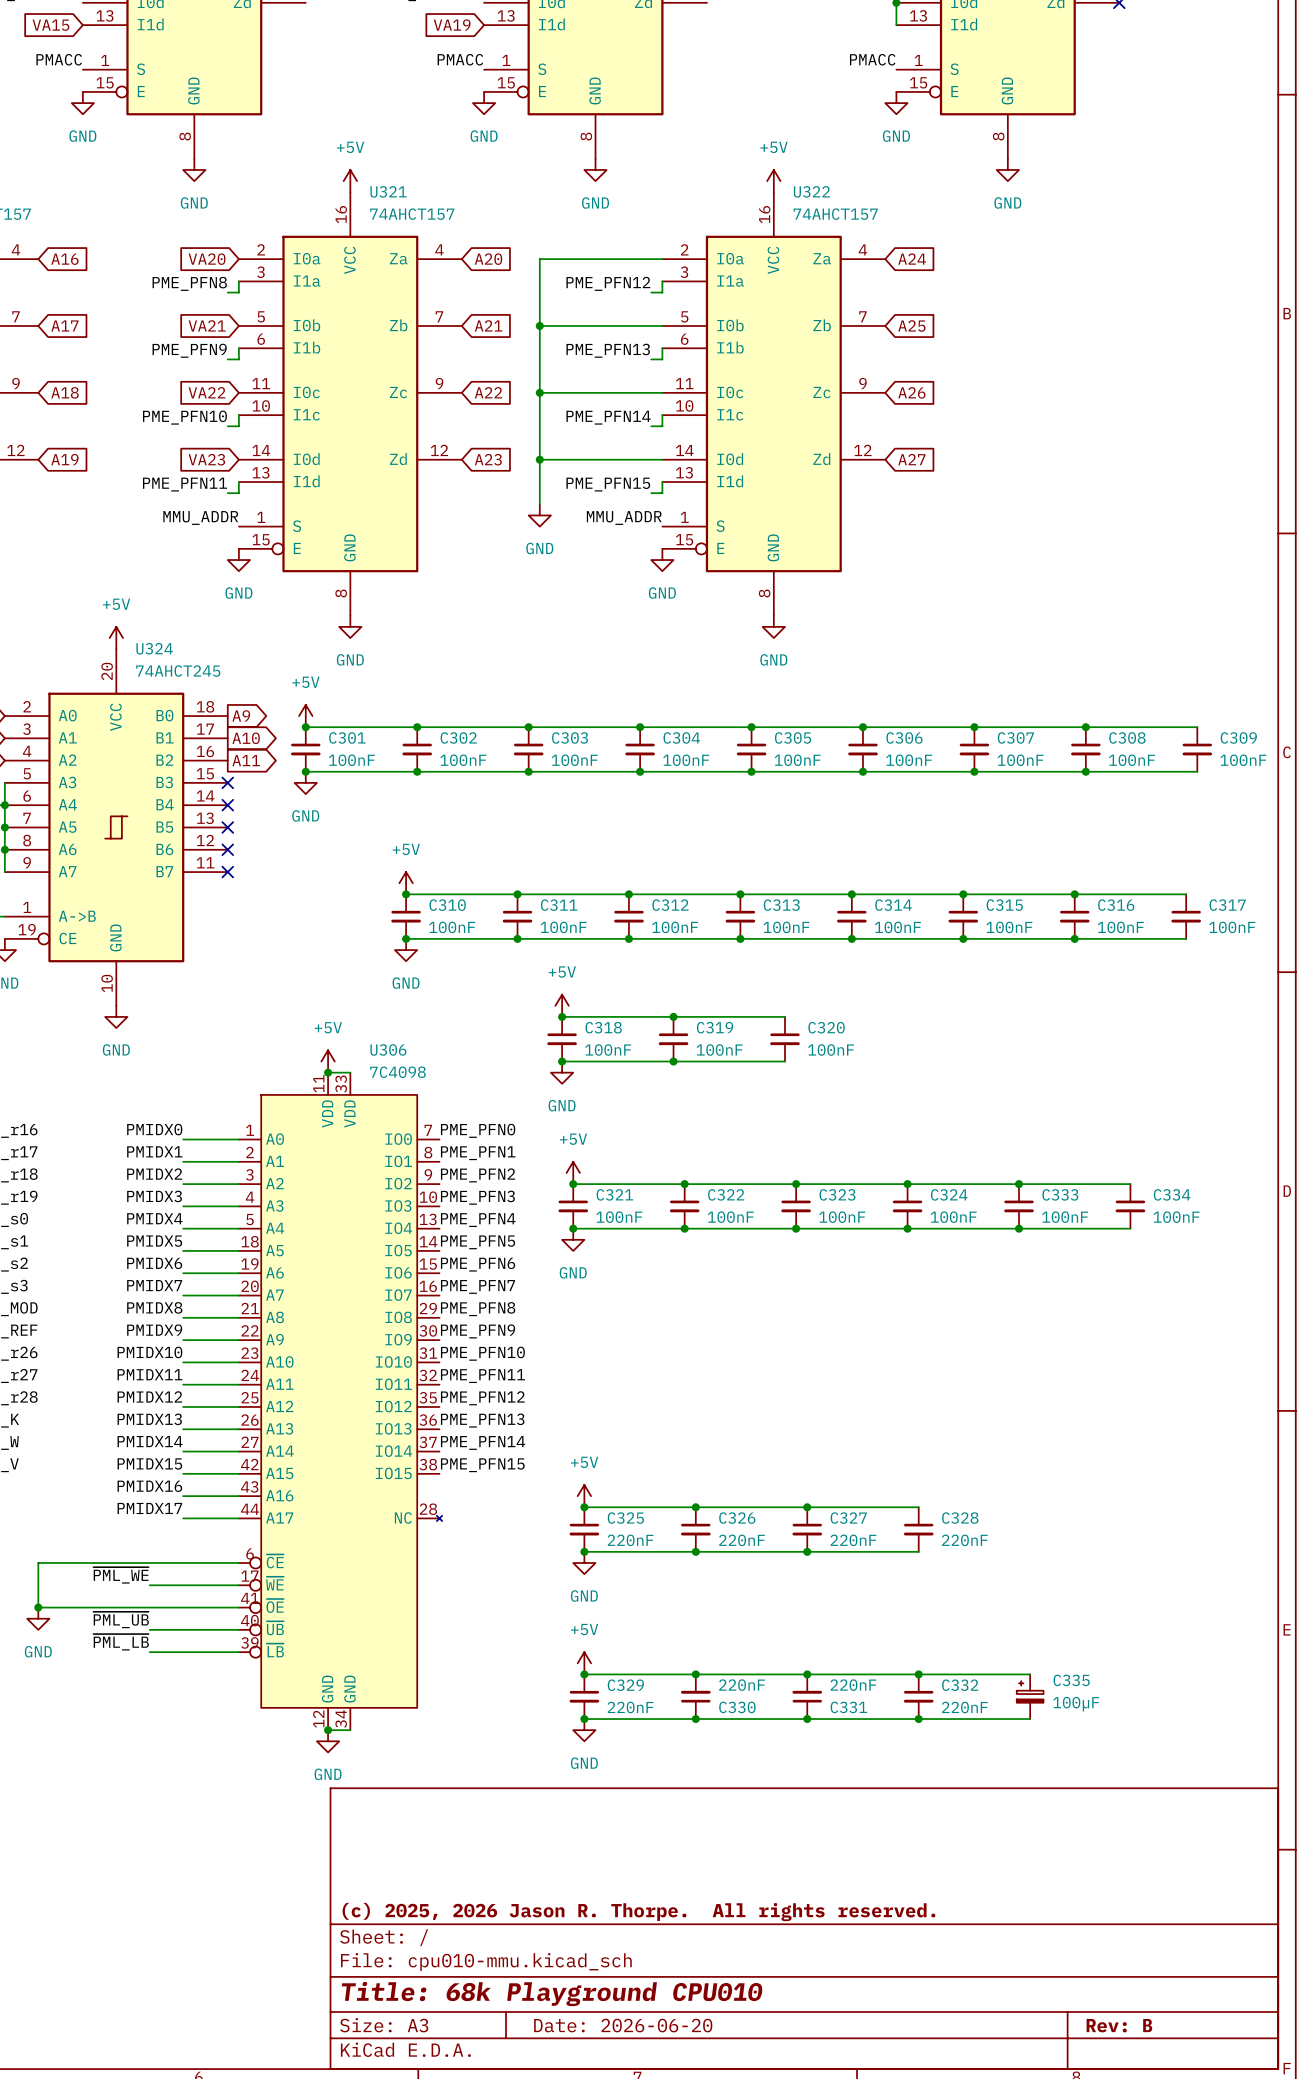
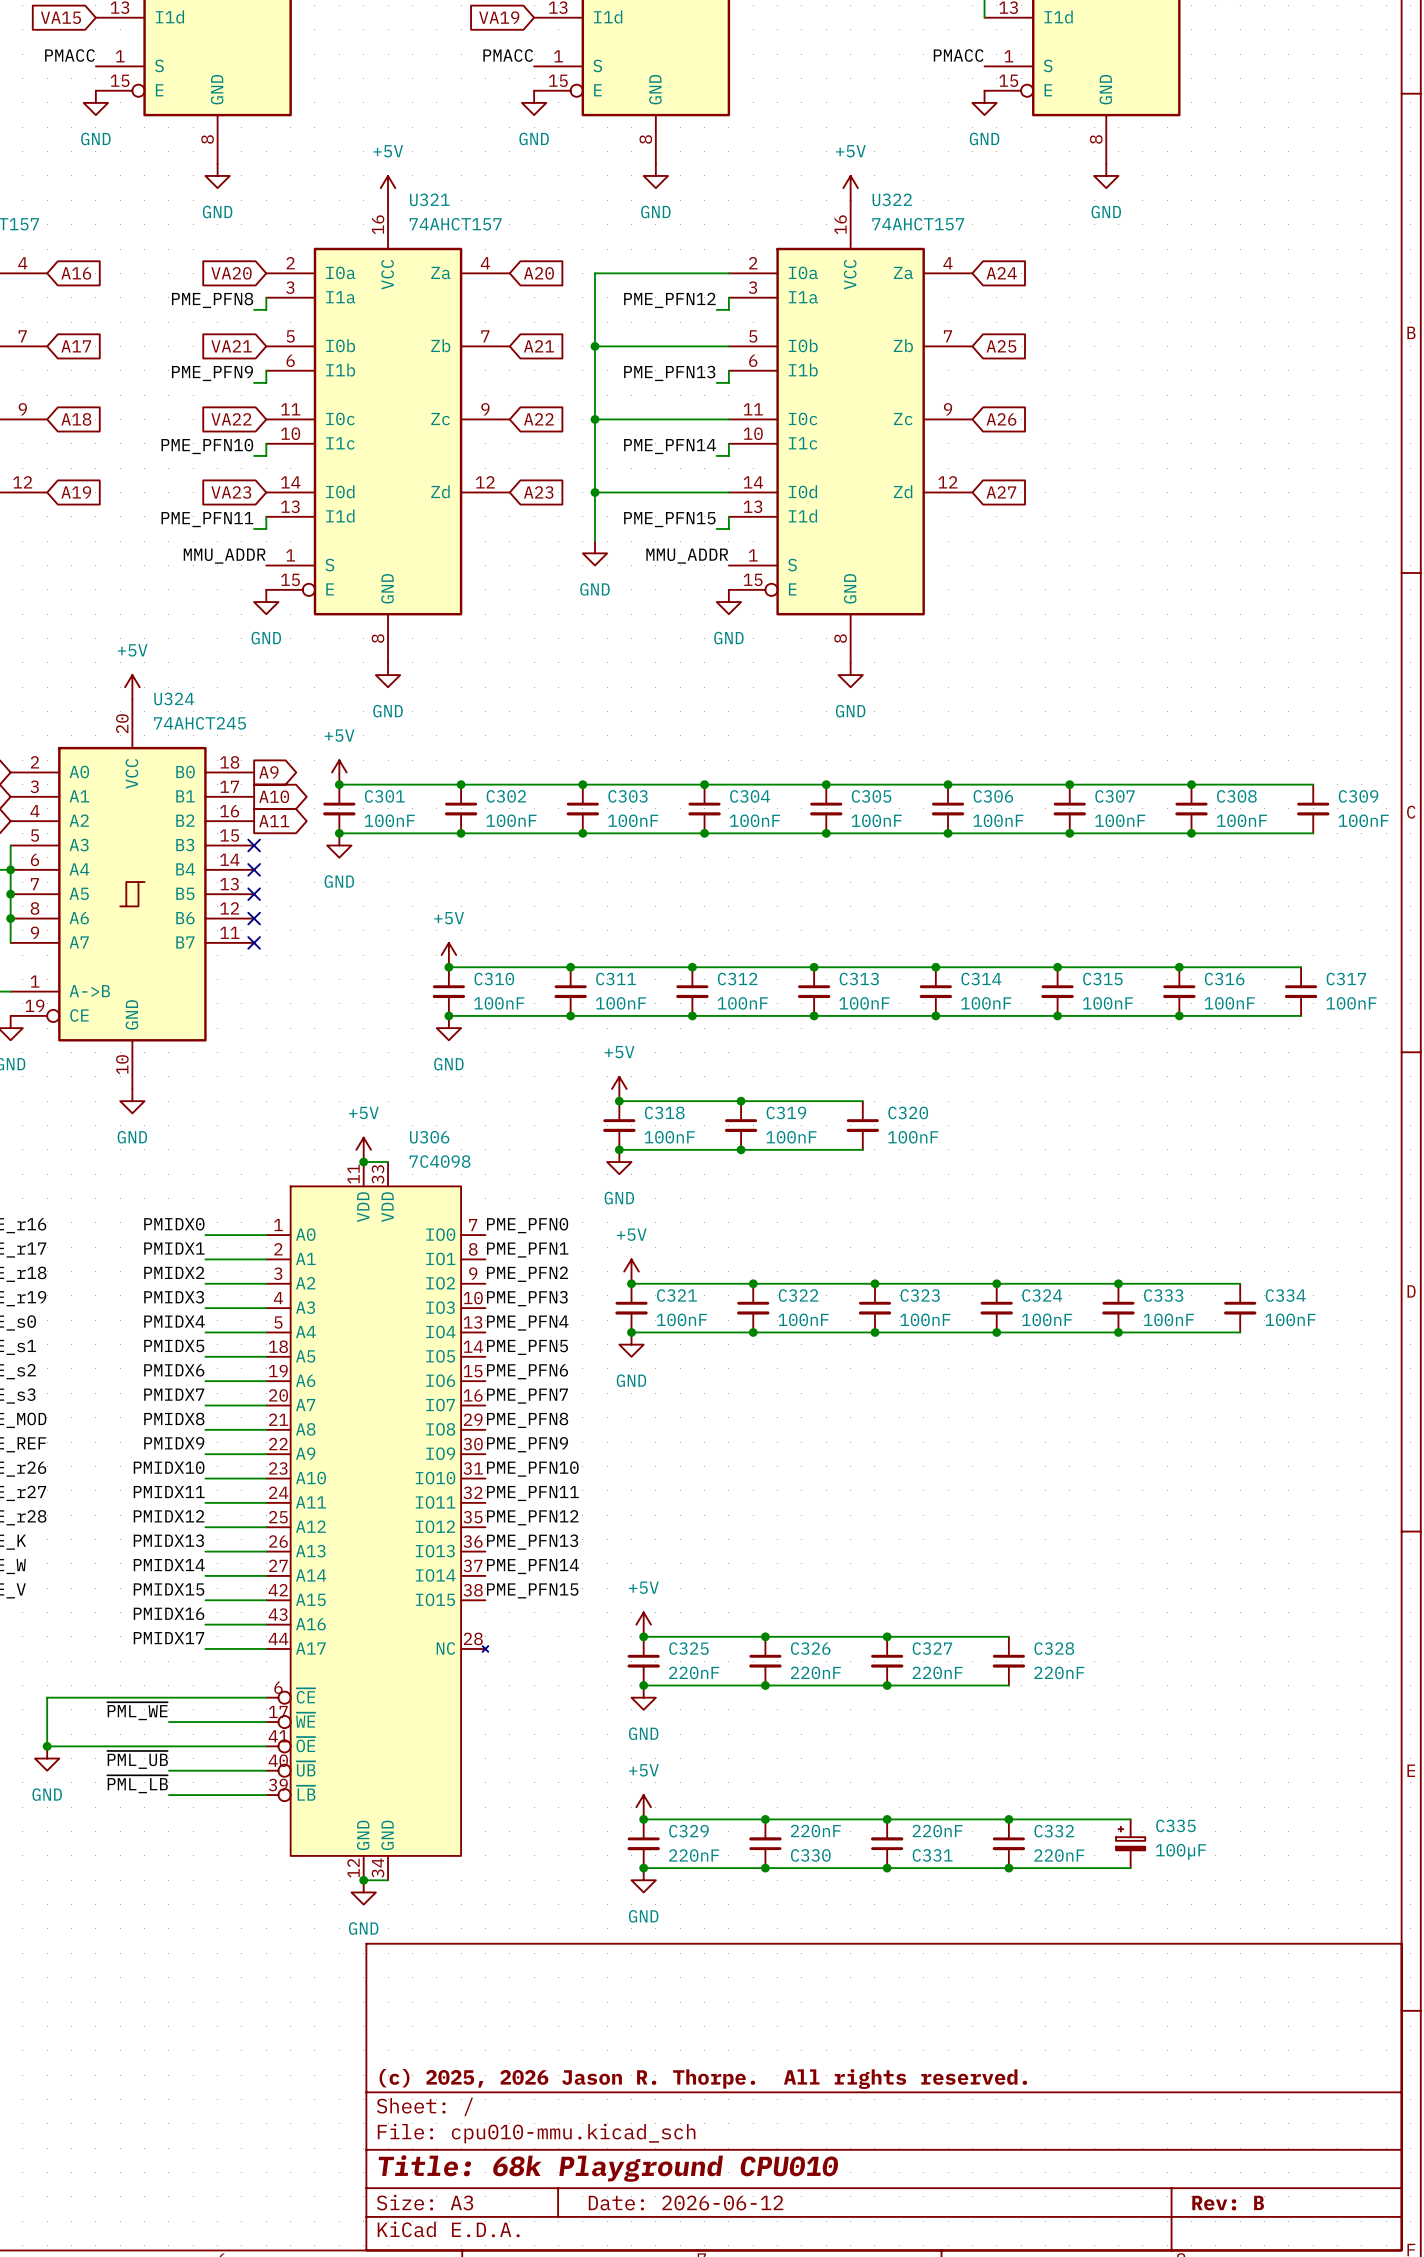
title block: Date: 2026-06-20 (623, 2025) -> Date: 2026-06-12 (686, 2202)

